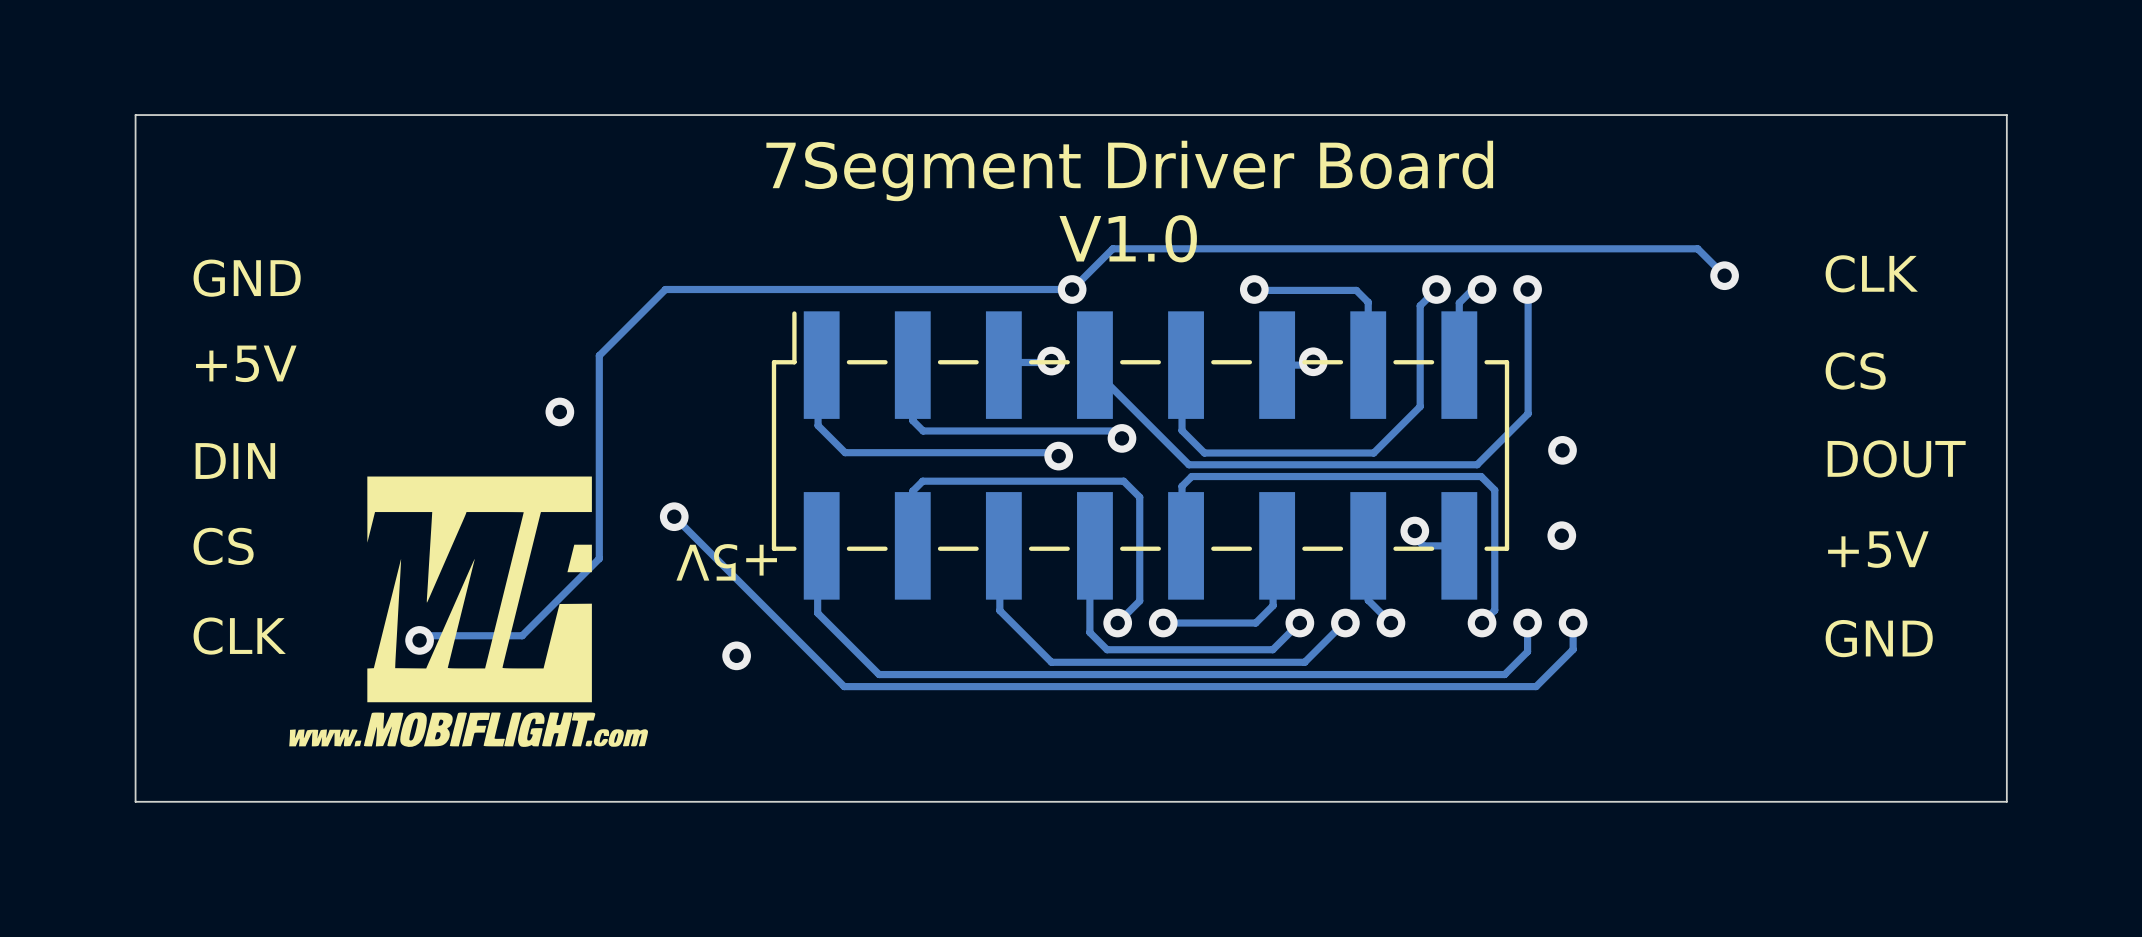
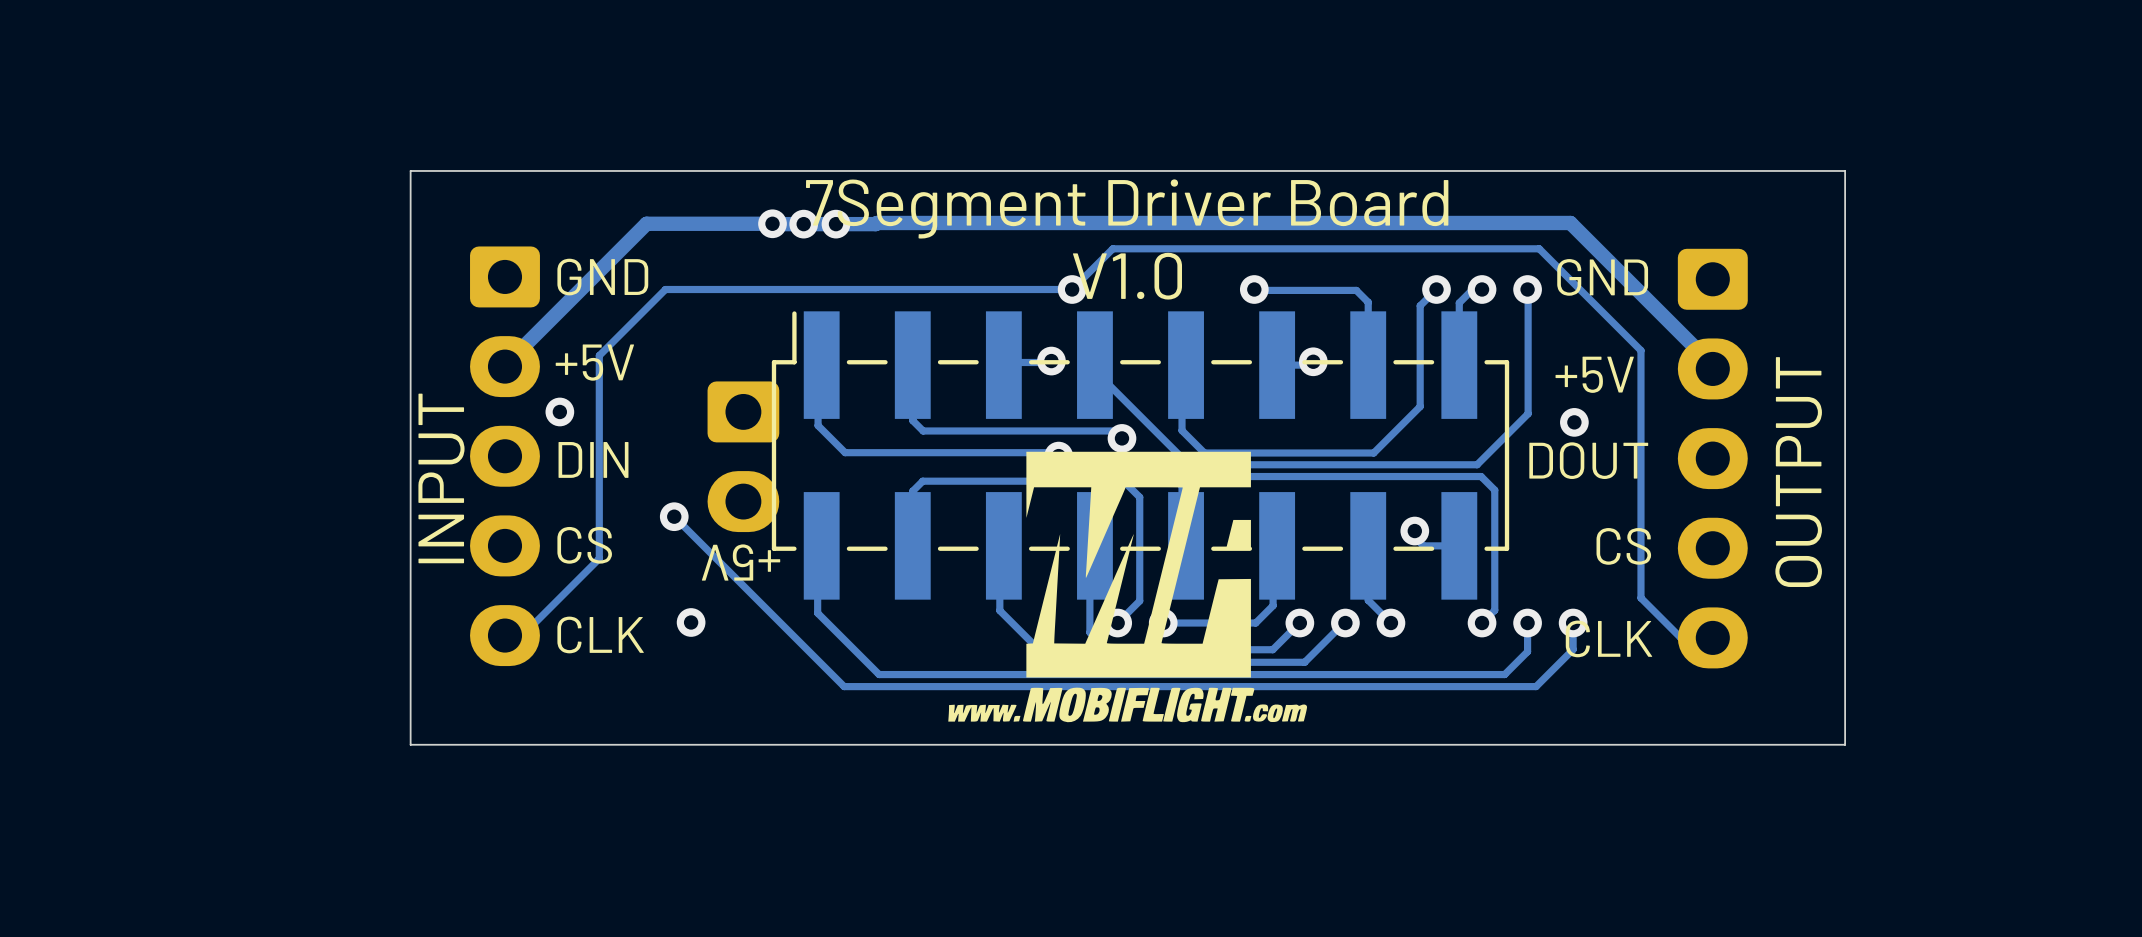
board edge: (2006, 115) (135, 115) (135, 801) (2006, 801) (2006, 115) -> (1845, 170) (1845, 744) (410, 744) (410, 170) (1845, 170)
text position: 7Segment Driver Board (1129, 170) -> 7Segment Driver Board (1127, 208)
track: none -> (772, 223) (646, 223) (504, 366)
via: none -> (772, 223)
track: none -> (772, 224) (1570, 222) (1712, 365) (1712, 368)
via: none -> (803, 224)
via: none -> (835, 224)
text position: V1.0 (1128, 238) -> V1.0 (1127, 276)
track: (1539, 248) (1697, 248) (1724, 275) -> (1539, 248) (1640, 350) (1640, 598) (1680, 637) (1712, 637)
text position: CLK (1871, 273) -> CLK (1608, 638)
via: (1724, 275) -> none
text position: GND (247, 278) -> GND (602, 277)
text position: +5V (246, 363) -> +5V (594, 362)
text position: CS (1855, 371) -> CS (1623, 546)
via position: (1562, 450) -> (1574, 422)
part: none -> (504, 456)
part: none -> (743, 456)
part: none -> (1712, 458)
text position: DOUT (1896, 458) -> DOUT (1588, 460)
text position: DIN (235, 461) -> DIN (593, 459)
text: none -> OUTPUT (1798, 472)
text: none -> INPUT (441, 478)
via: (1561, 535) -> none
text position: CS (223, 546) -> CS (584, 545)
text position: +5V (1878, 549) -> +5V (1594, 374)
drawing position: (468, 611) -> (1127, 586)
track: (522, 635) (414, 635) (419, 640) -> none
text position: CLK (239, 636) -> CLK (600, 634)
text position: GND (1879, 638) -> GND (1602, 277)
via: (419, 640) -> none
via position: (736, 655) -> (691, 622)

